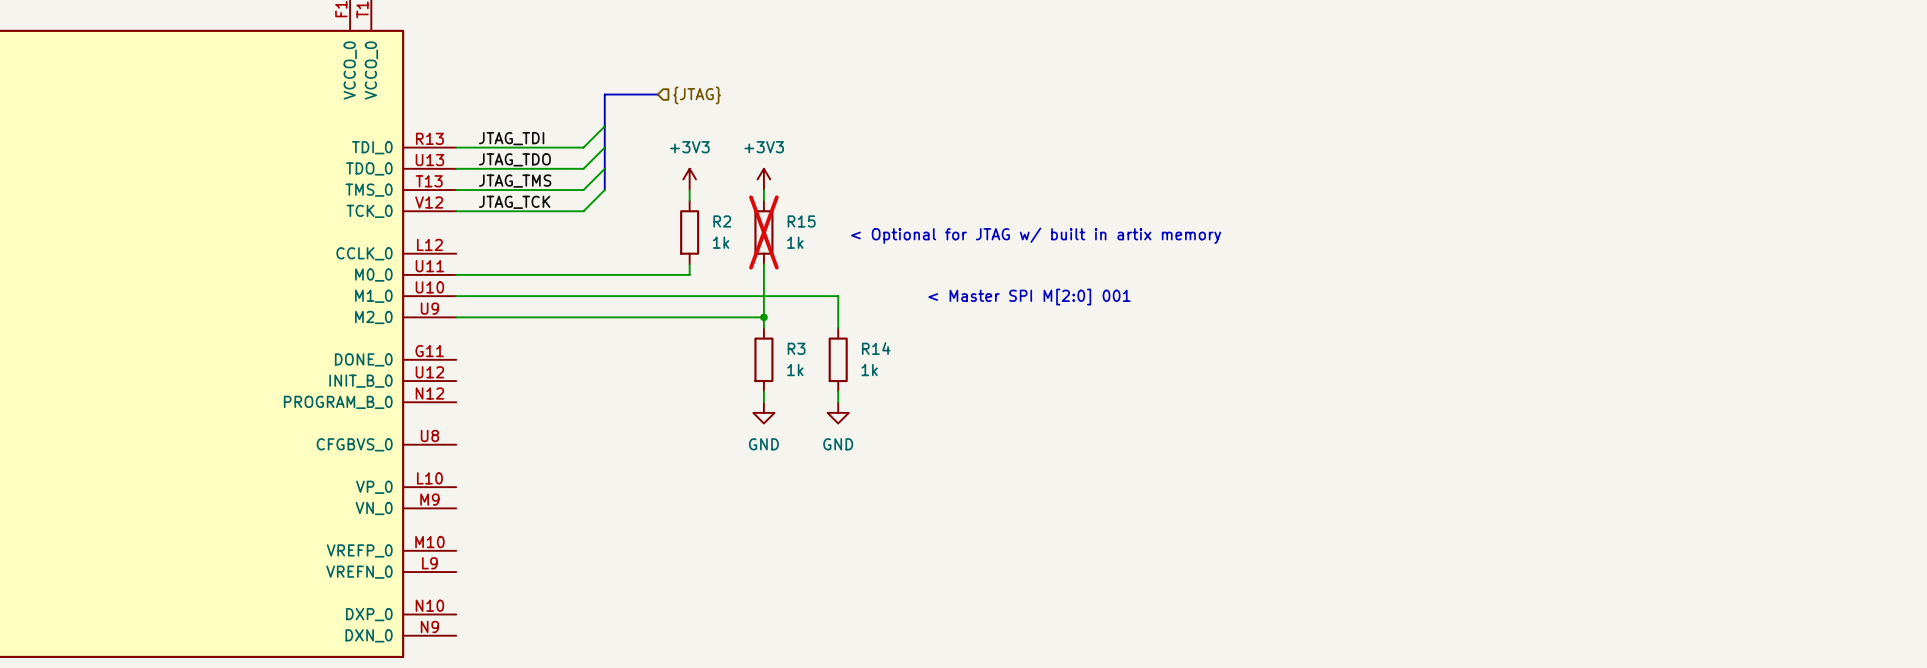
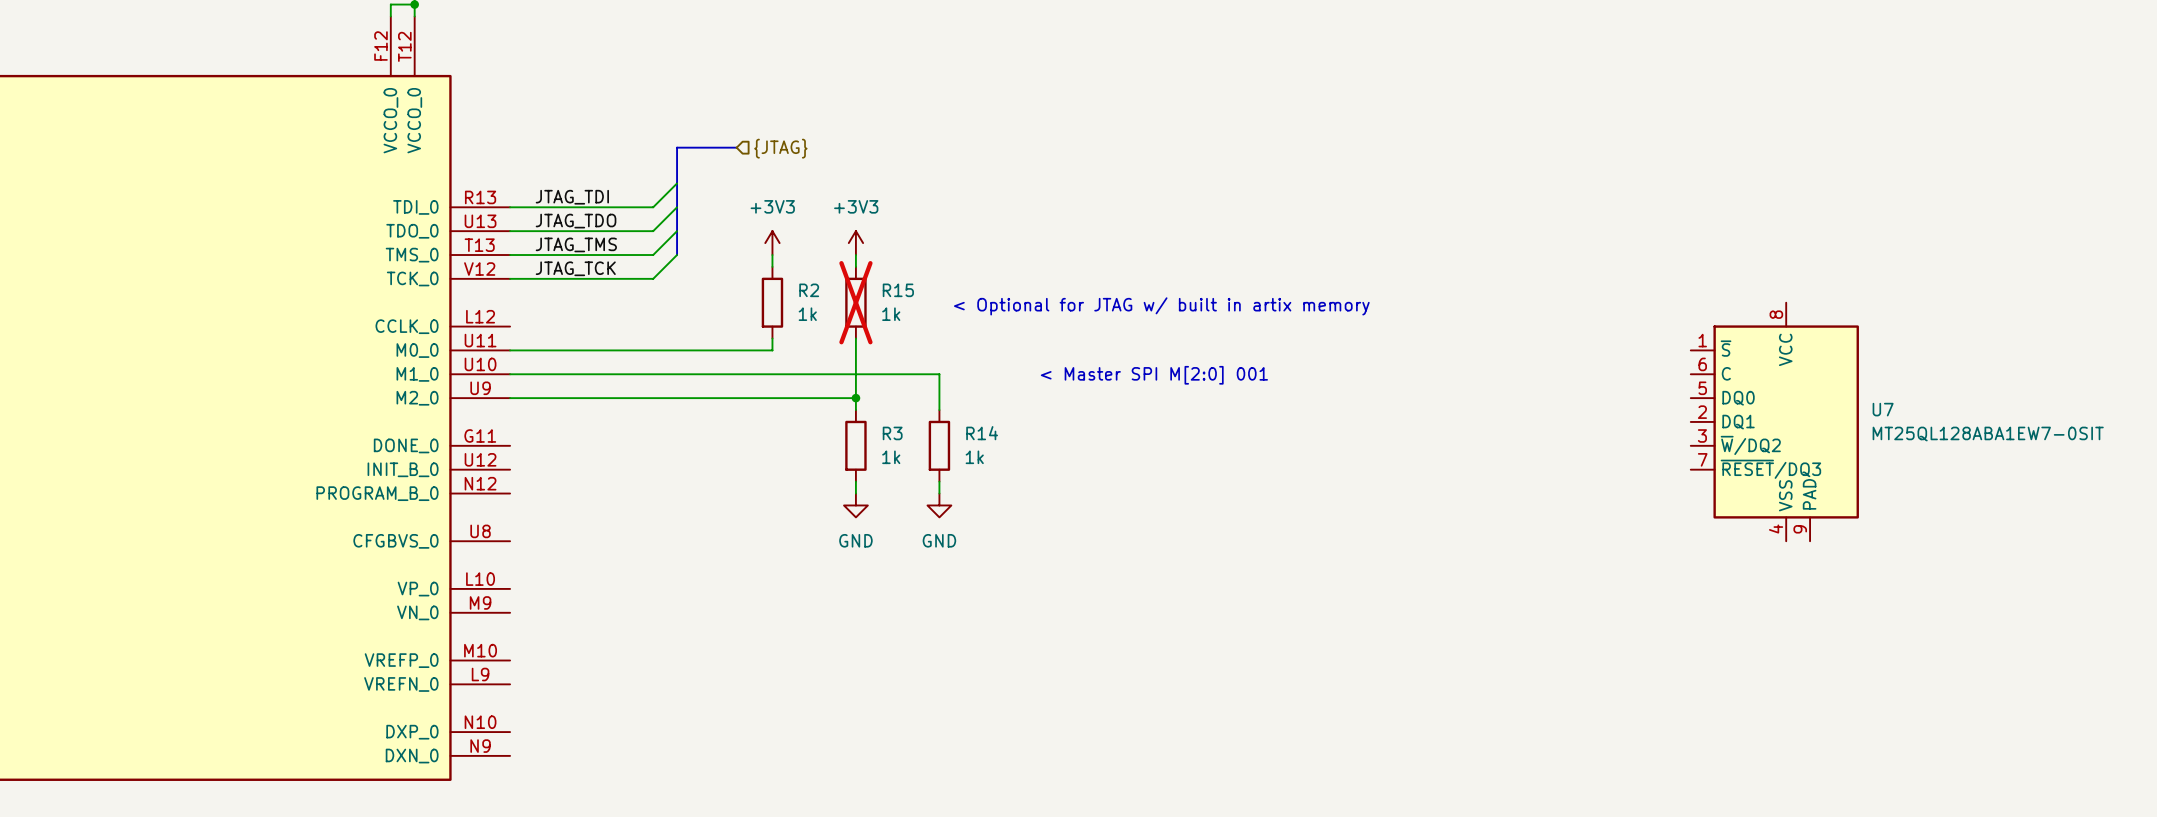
U7: none -> MT25QL128ABA1EW7-0SIT (1774, 421)

